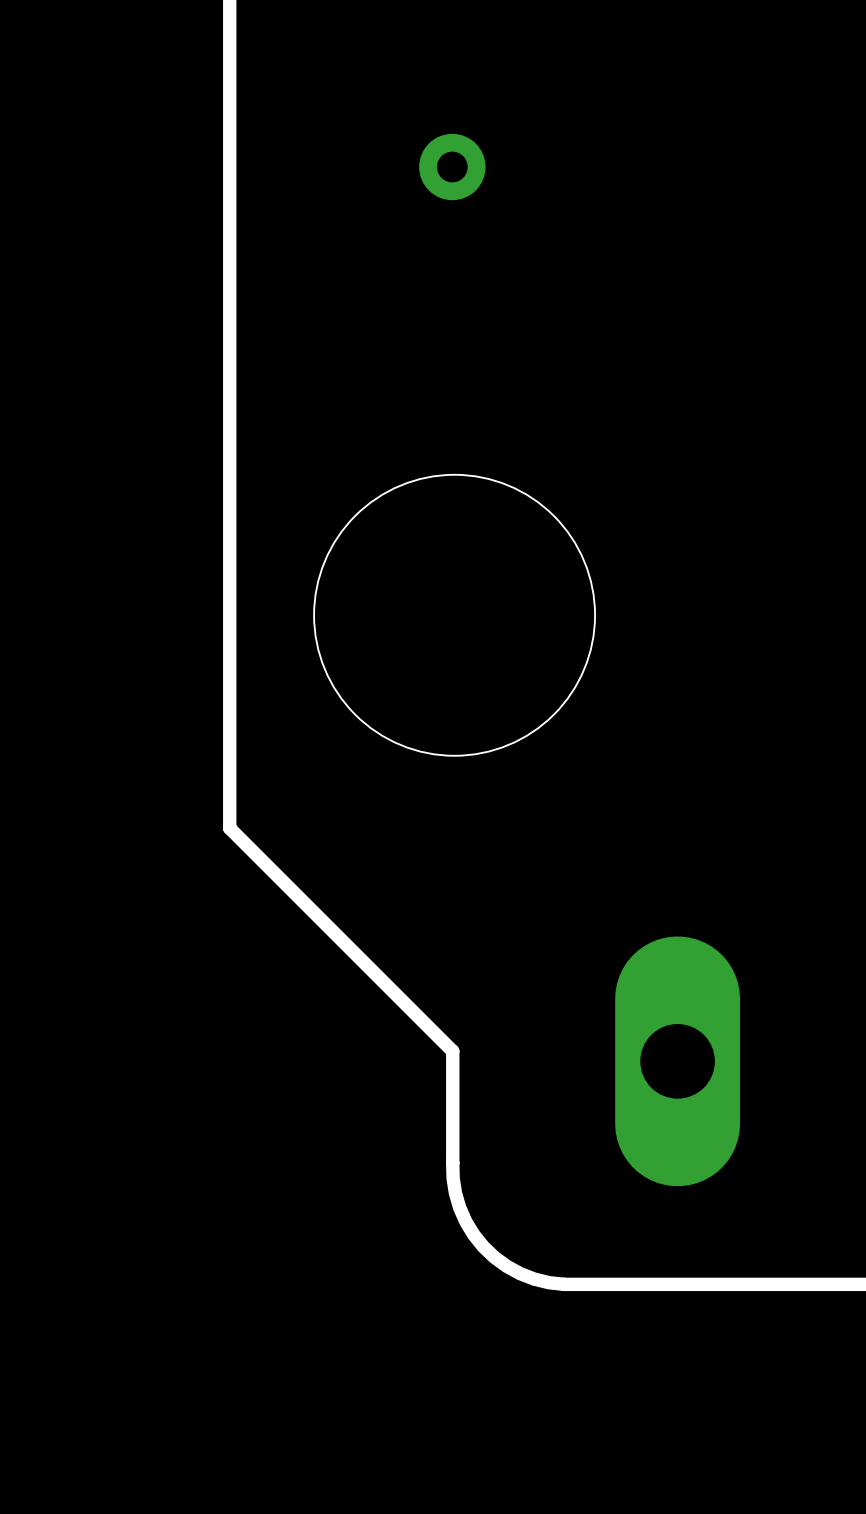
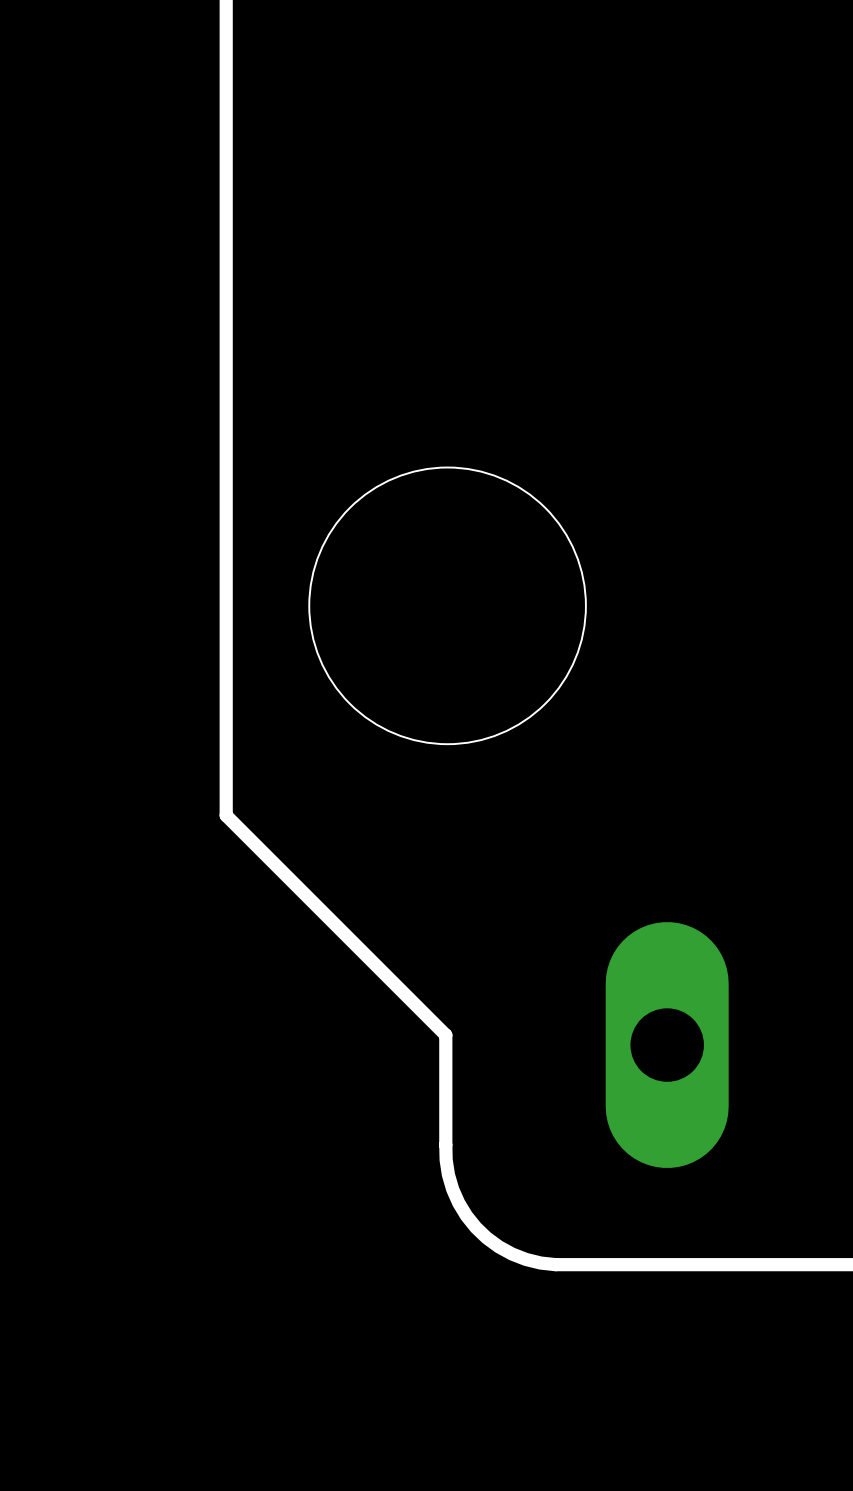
via: (452, 167) -> none

